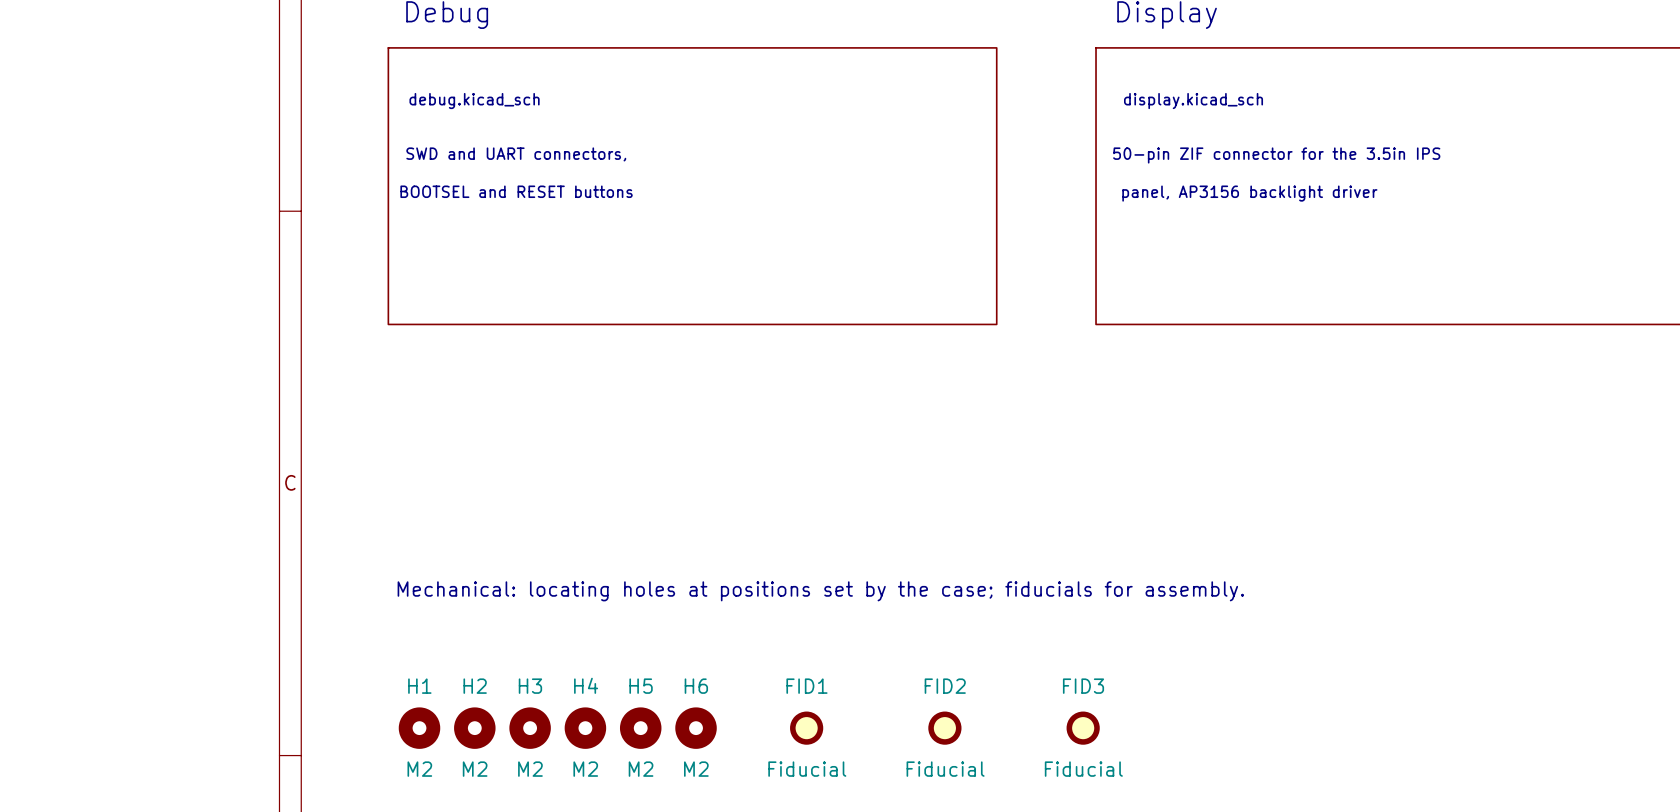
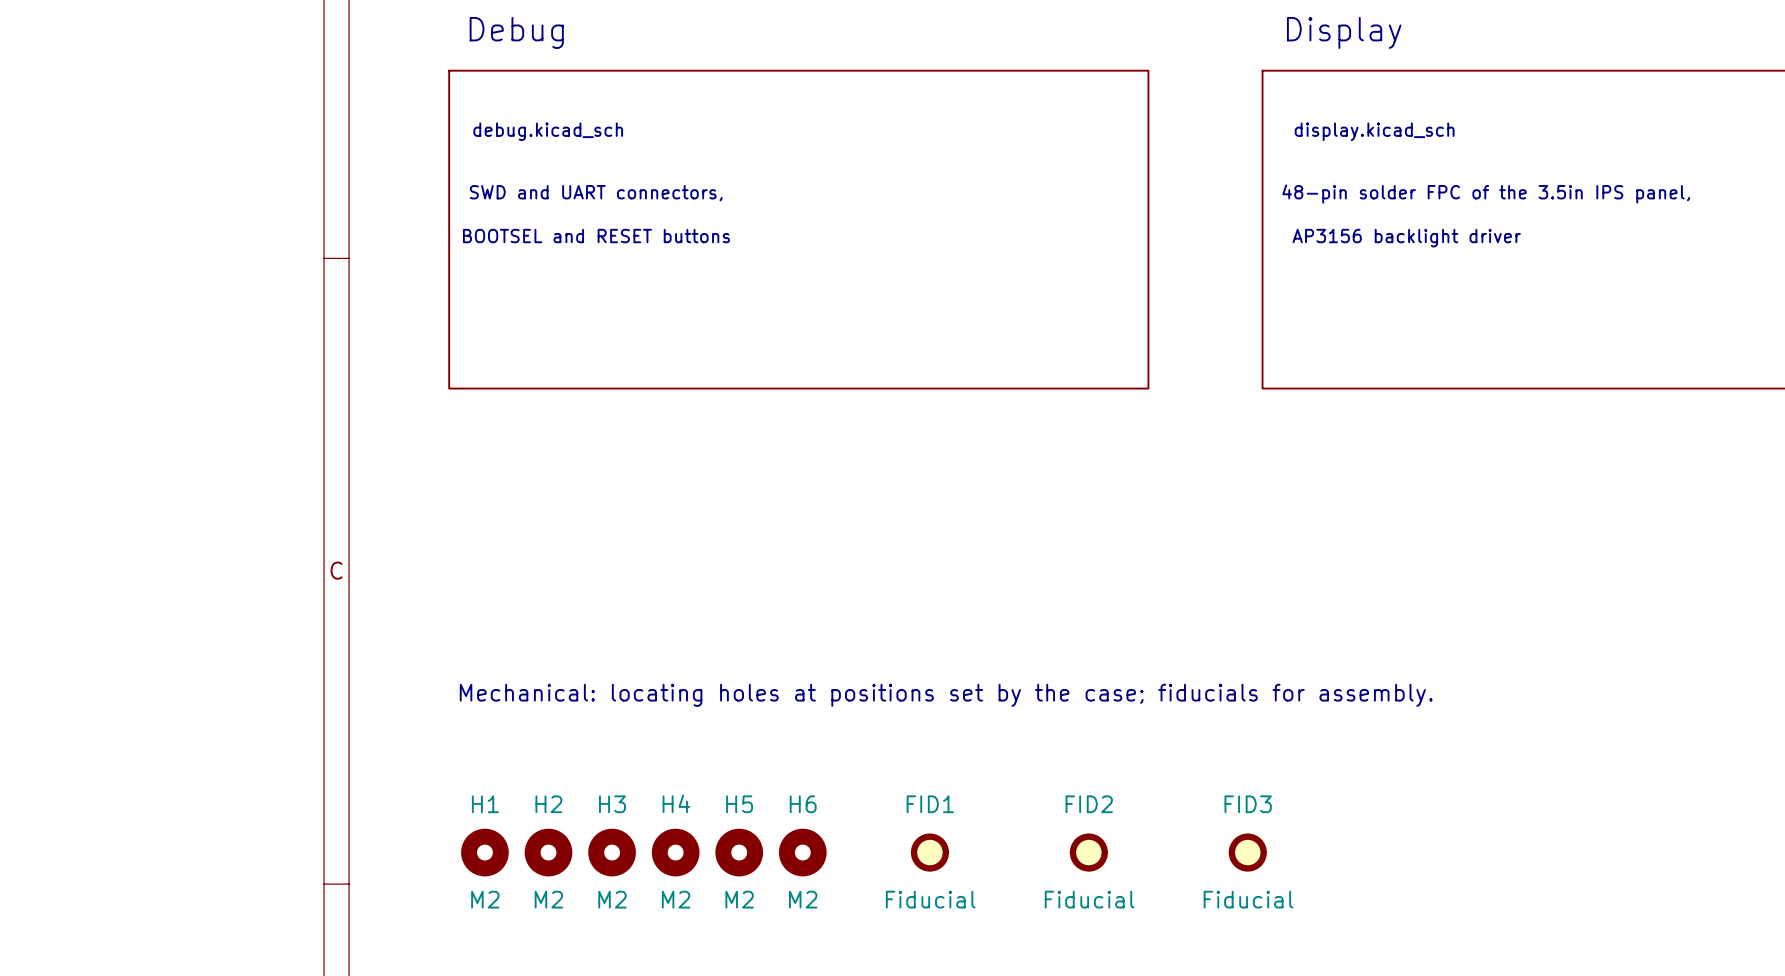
text: 50-pin ZIF connector for the 3.5in IPS (1276, 155) -> 48-pin solder FPC of the 3.5in IPS panel, (1486, 194)
text: panel, AP3156 backlight driver (1249, 193) -> AP3156 backlight driver (1406, 238)

